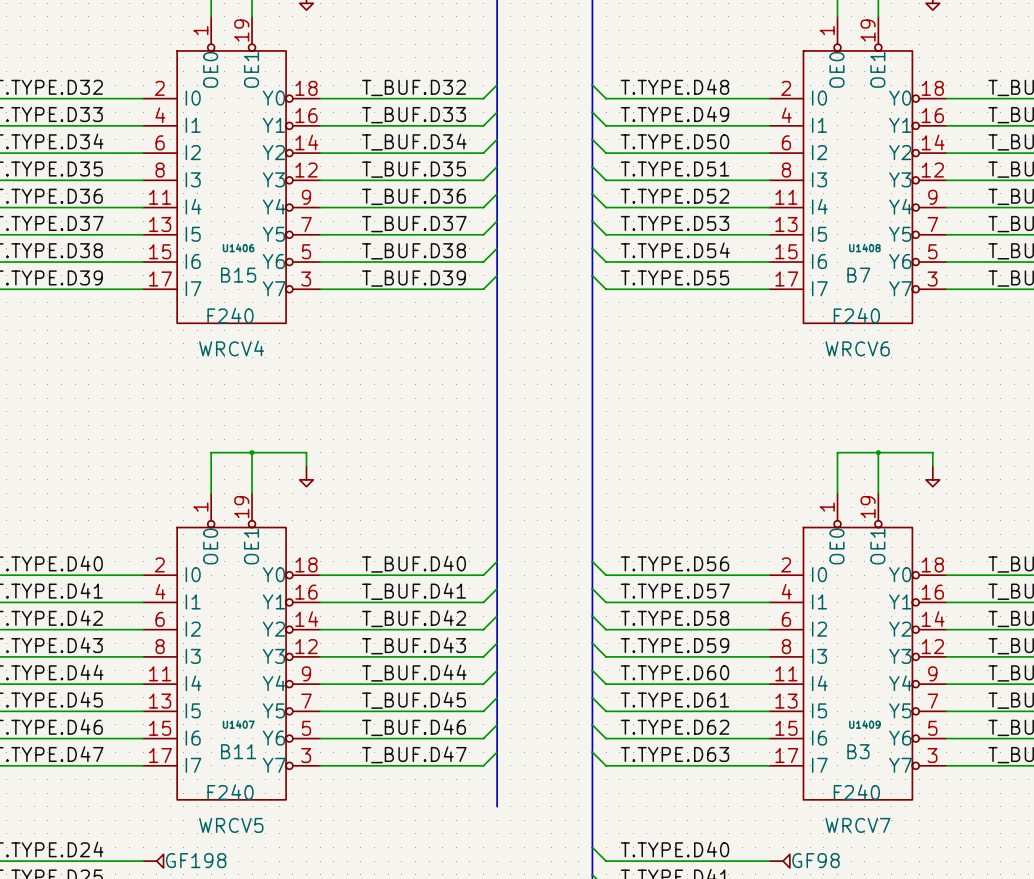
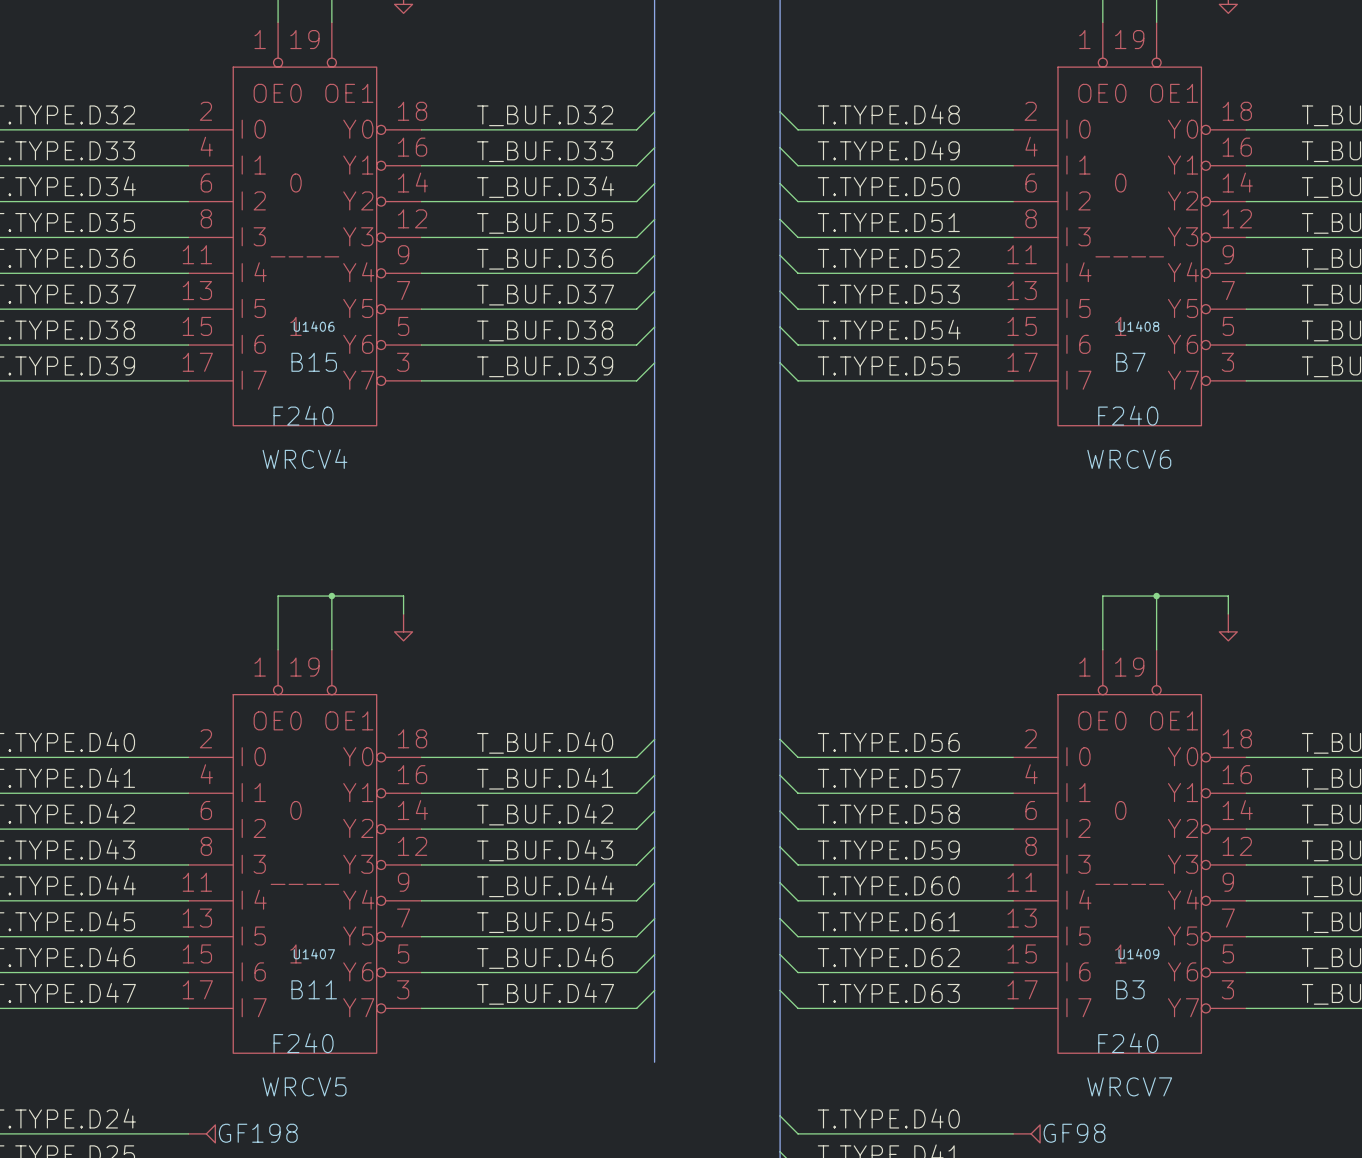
U1406 symbol: [143, 16, 321, 324] -> [188, 22, 422, 426]
U1408 symbol: [769, 16, 947, 324] -> [1013, 22, 1247, 426]
U1407 symbol: [143, 493, 321, 800] -> [188, 649, 422, 1054]
U1409 symbol: [769, 493, 947, 800] -> [1013, 649, 1247, 1054]

